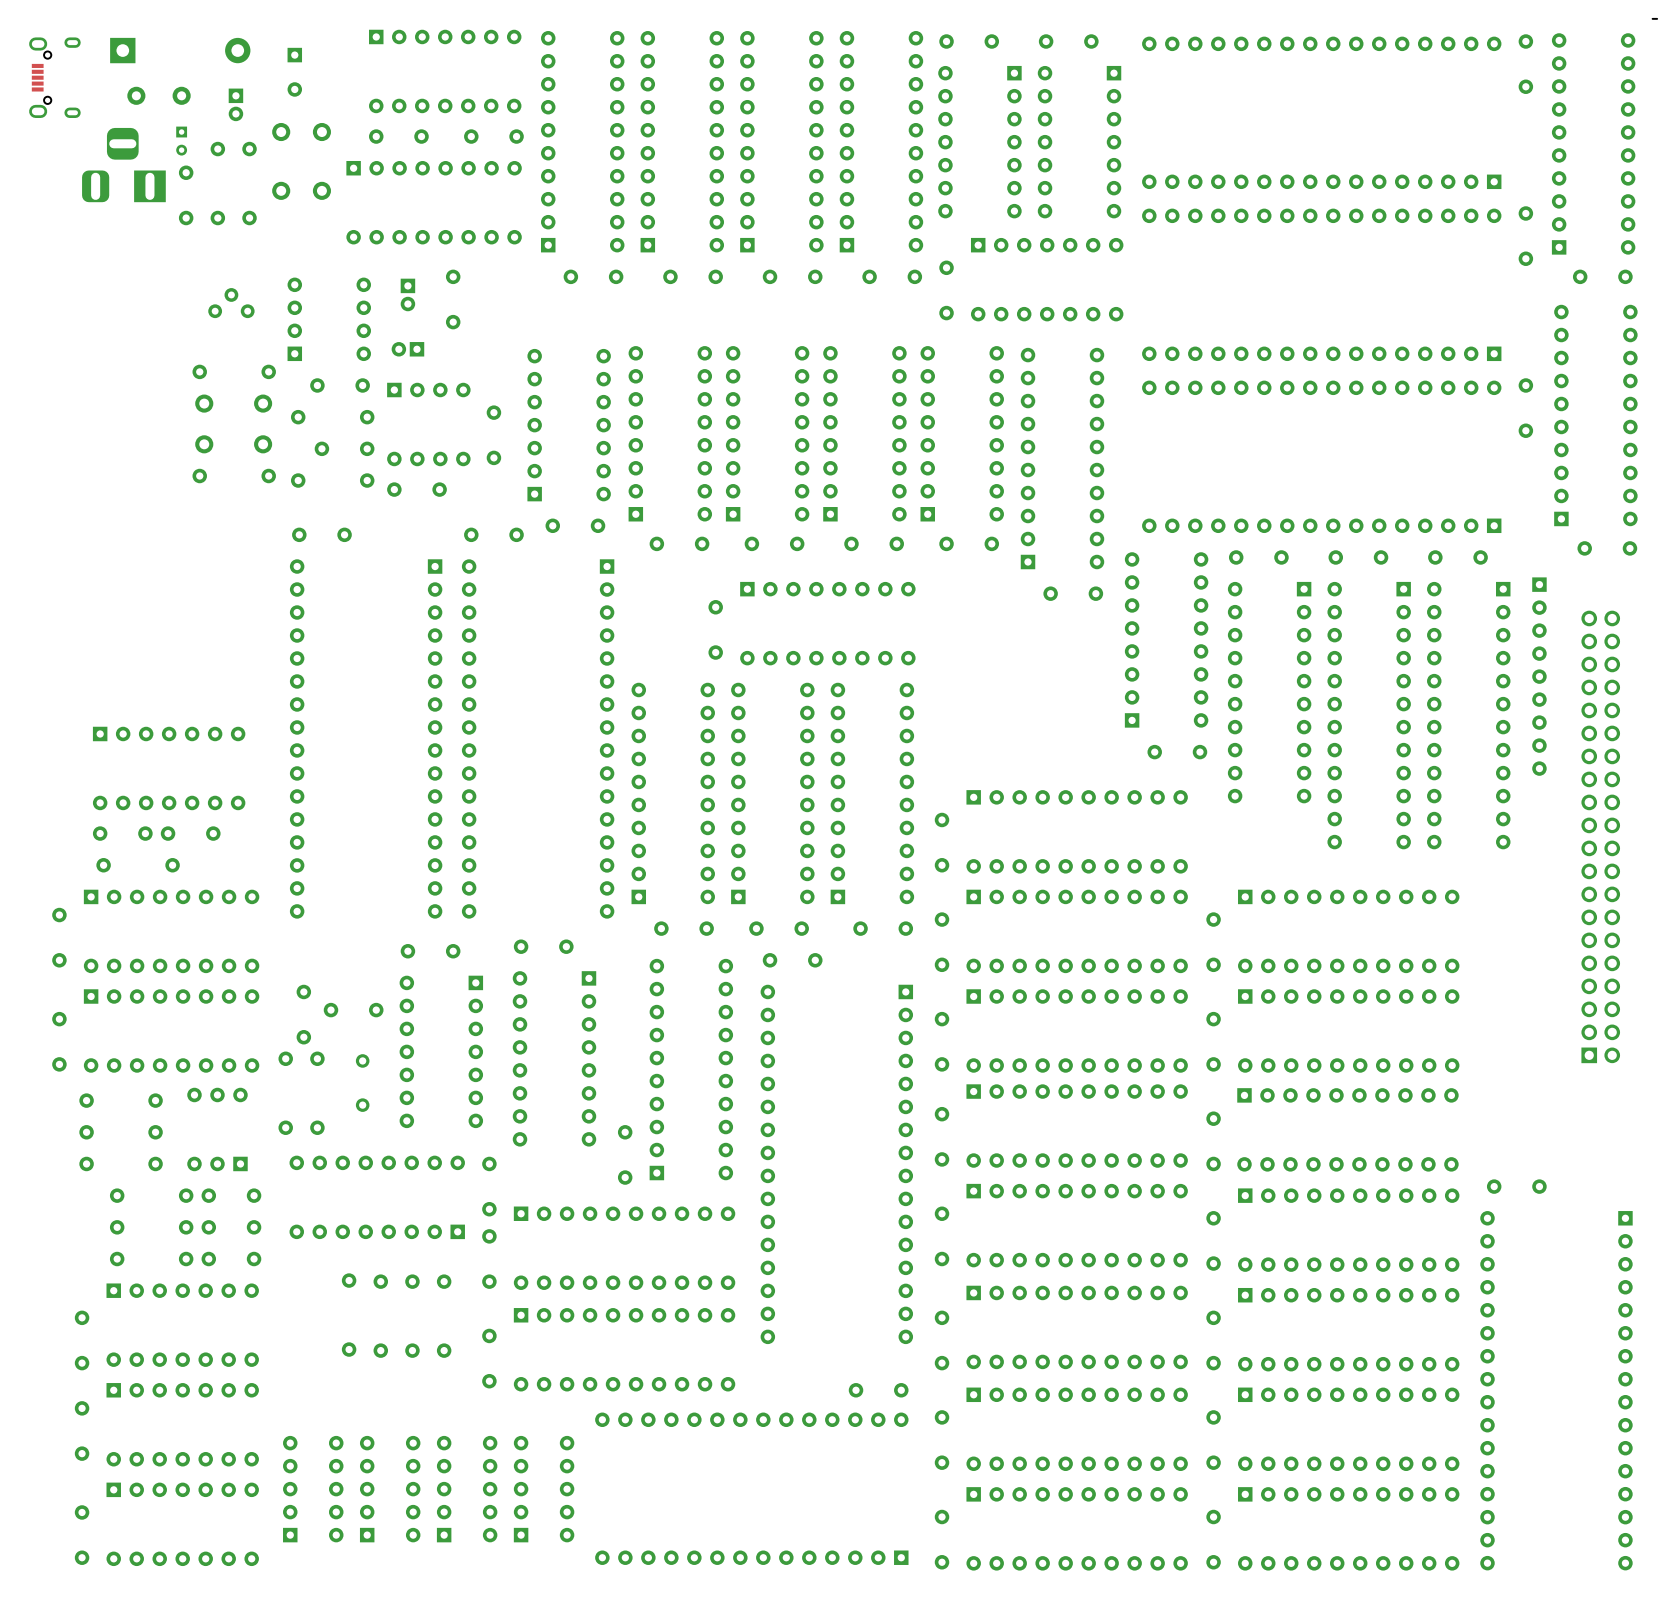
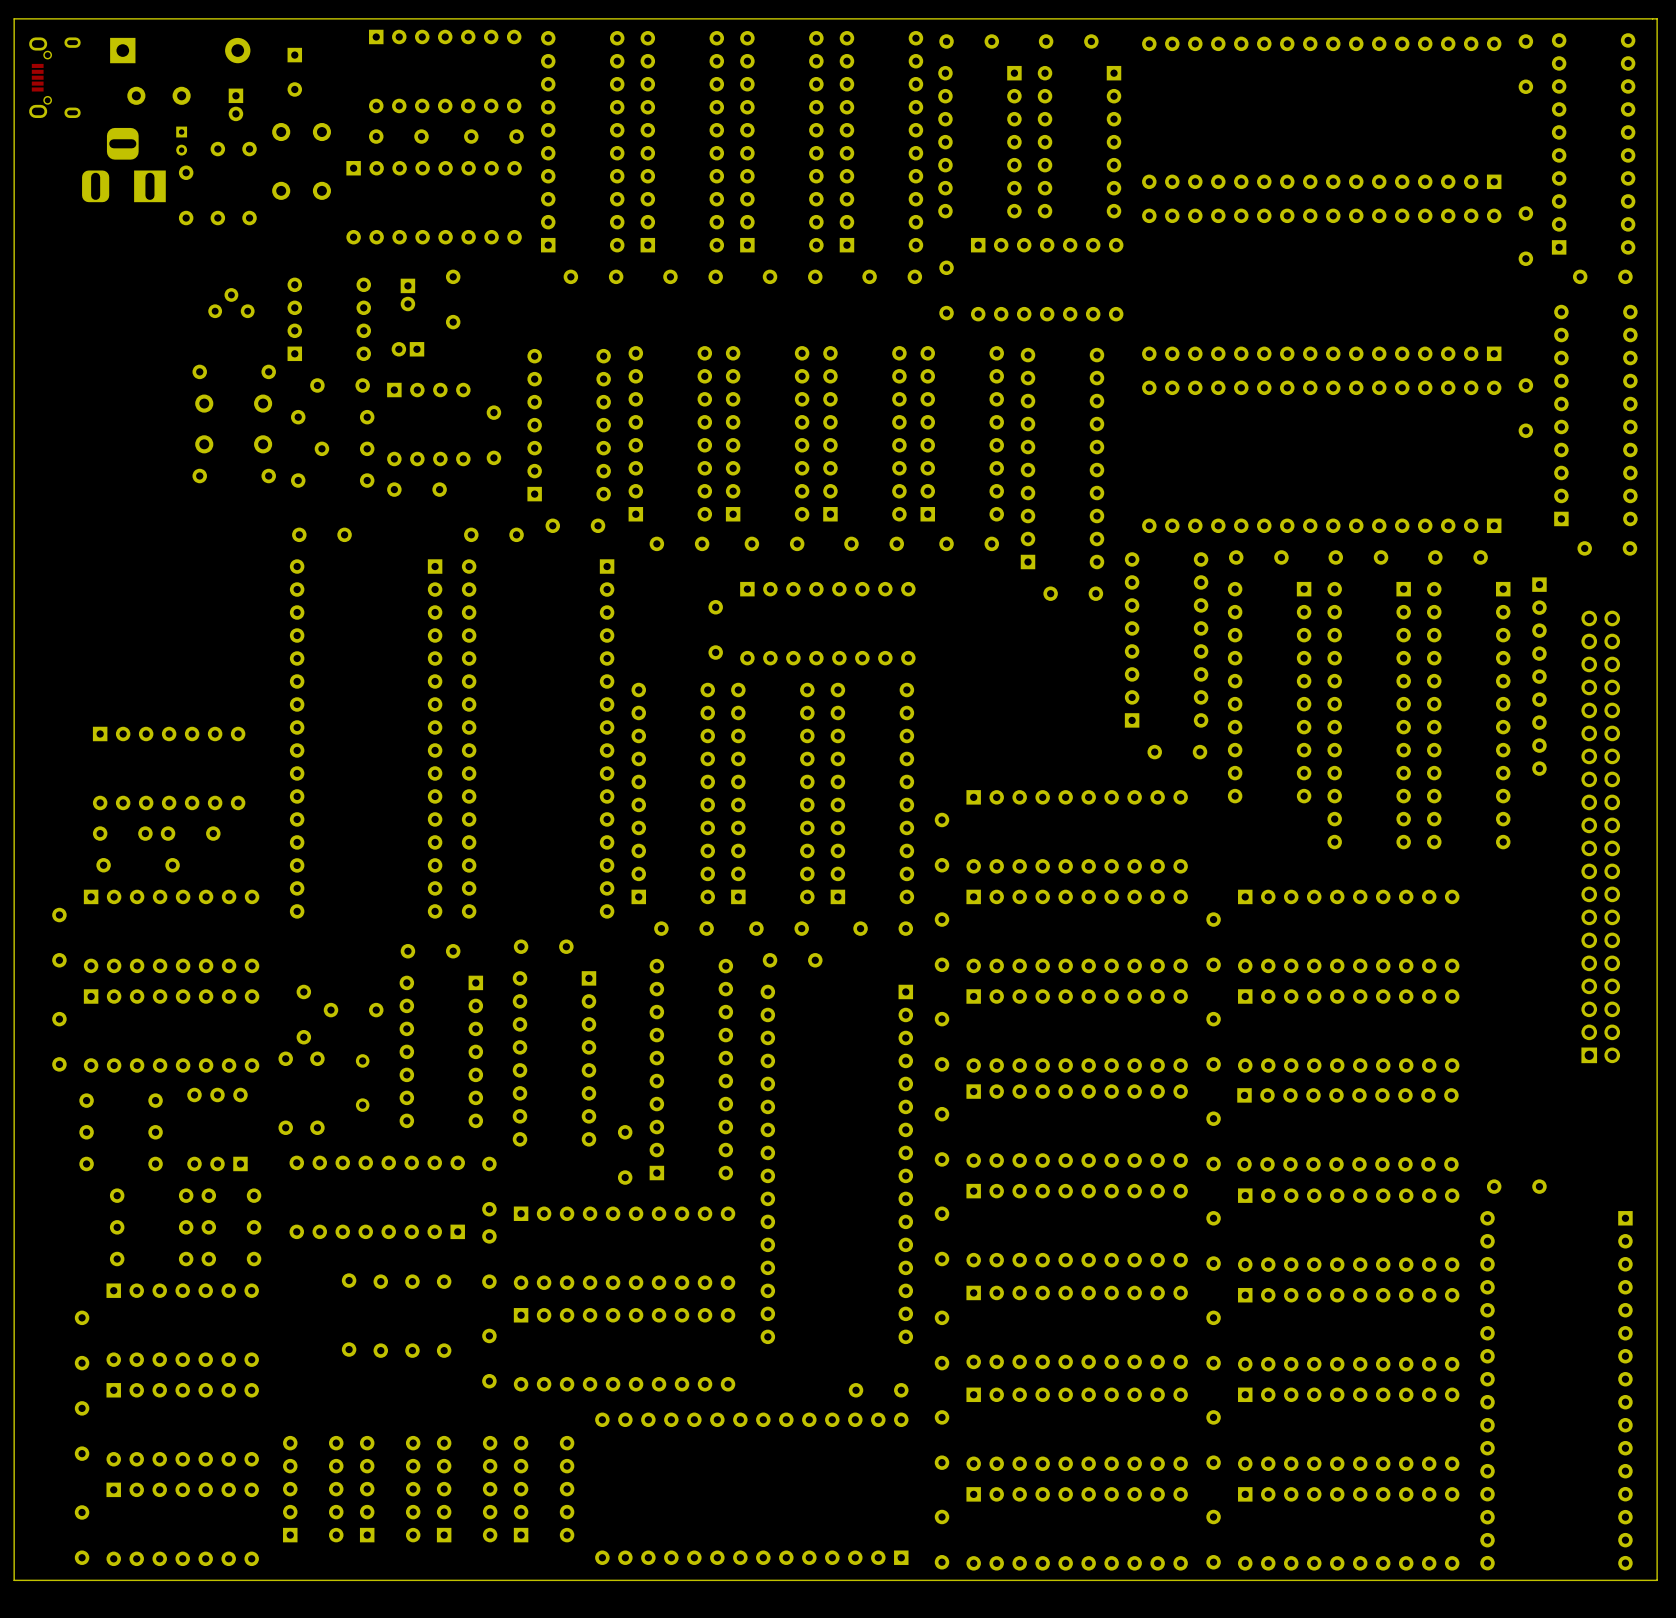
board edge: none -> (1657, 18) (1657, 1580) (14, 1580) (14, 18) (1652, 18)

